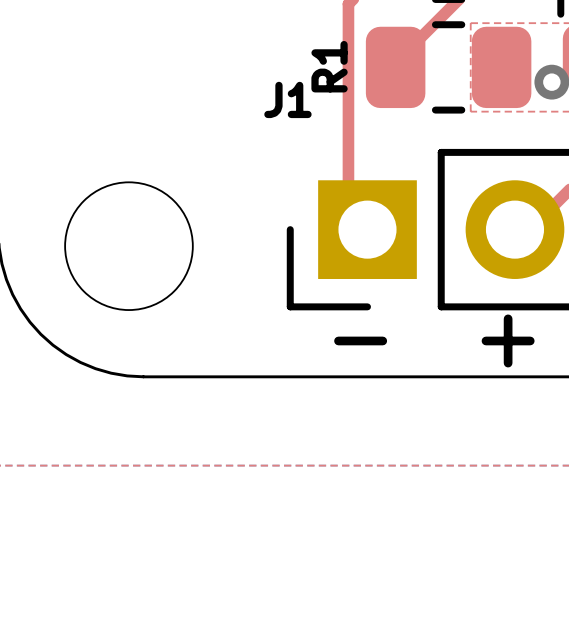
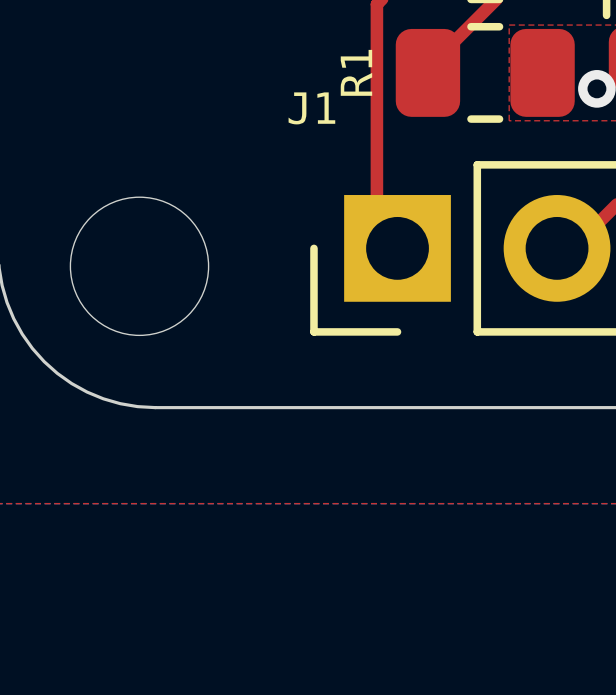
text: - (360, 340) -> none
text: + (508, 340) -> none

